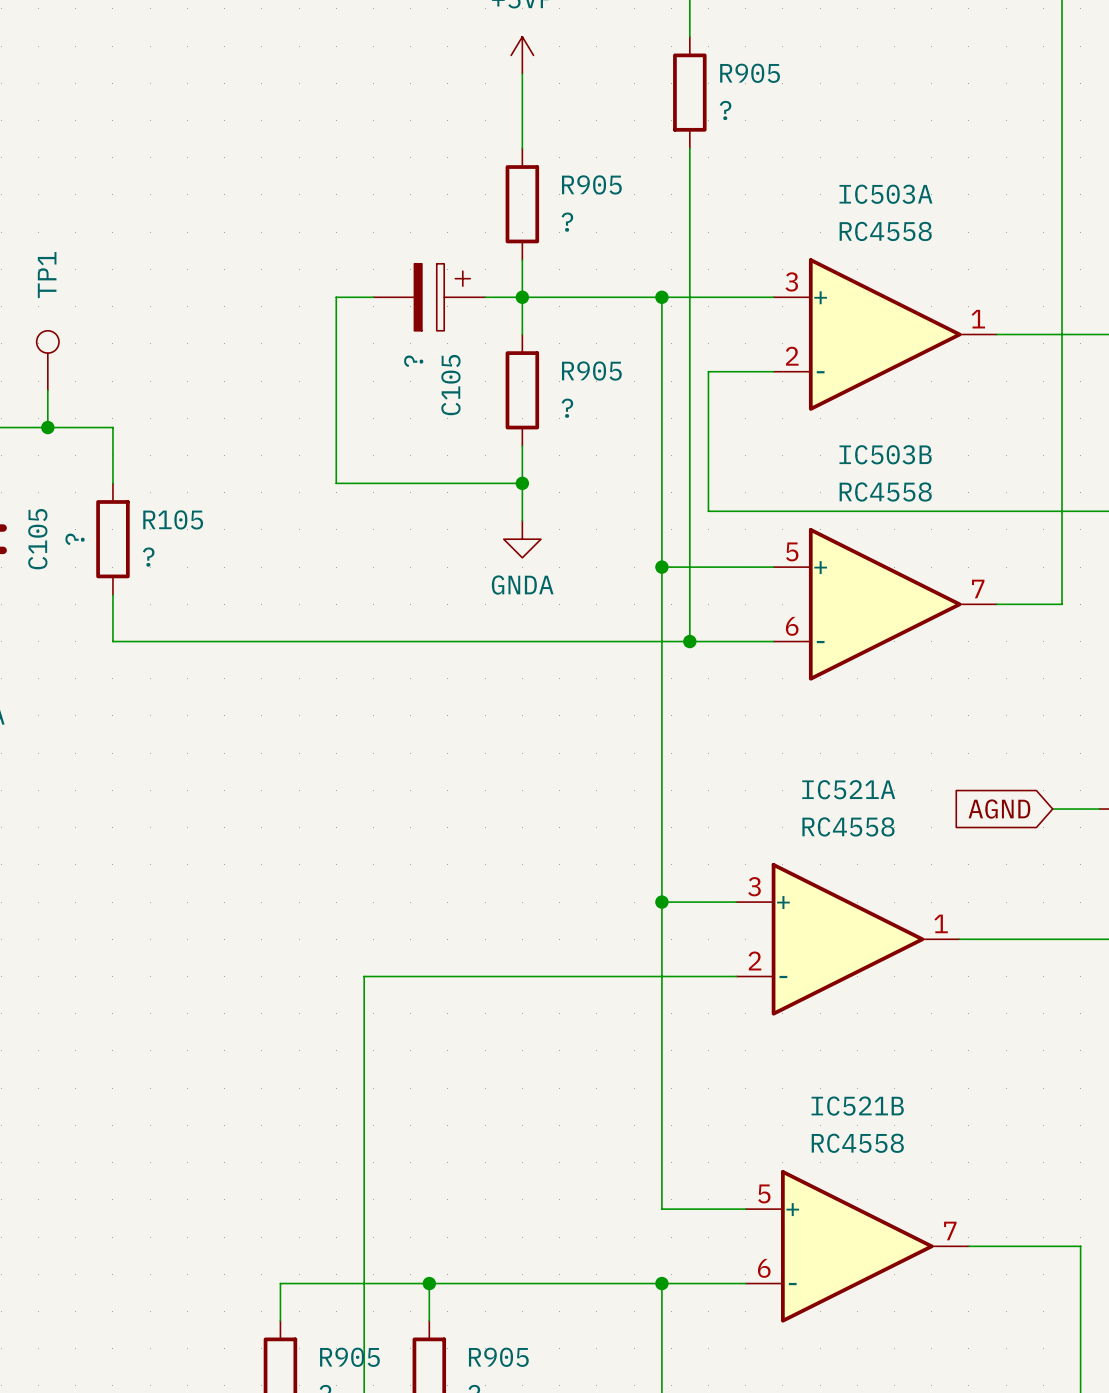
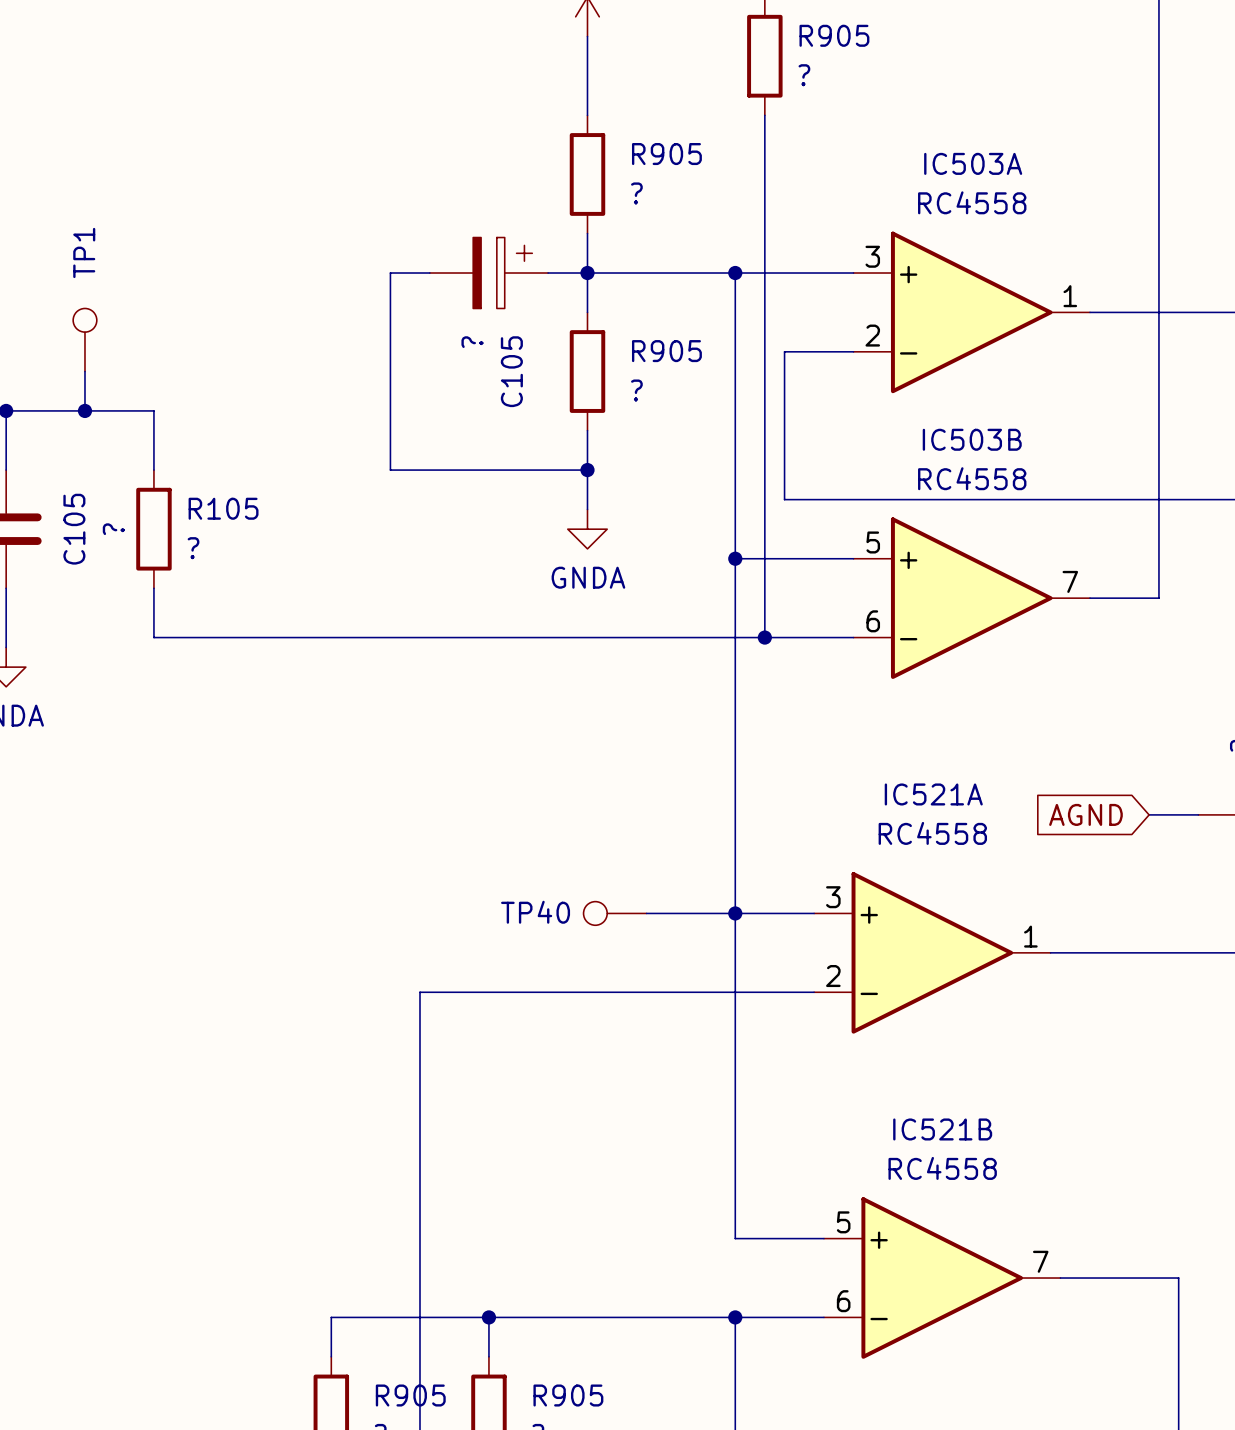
TP40: none -> (615, 913)
wire: none -> (646, 913) (735, 913)

